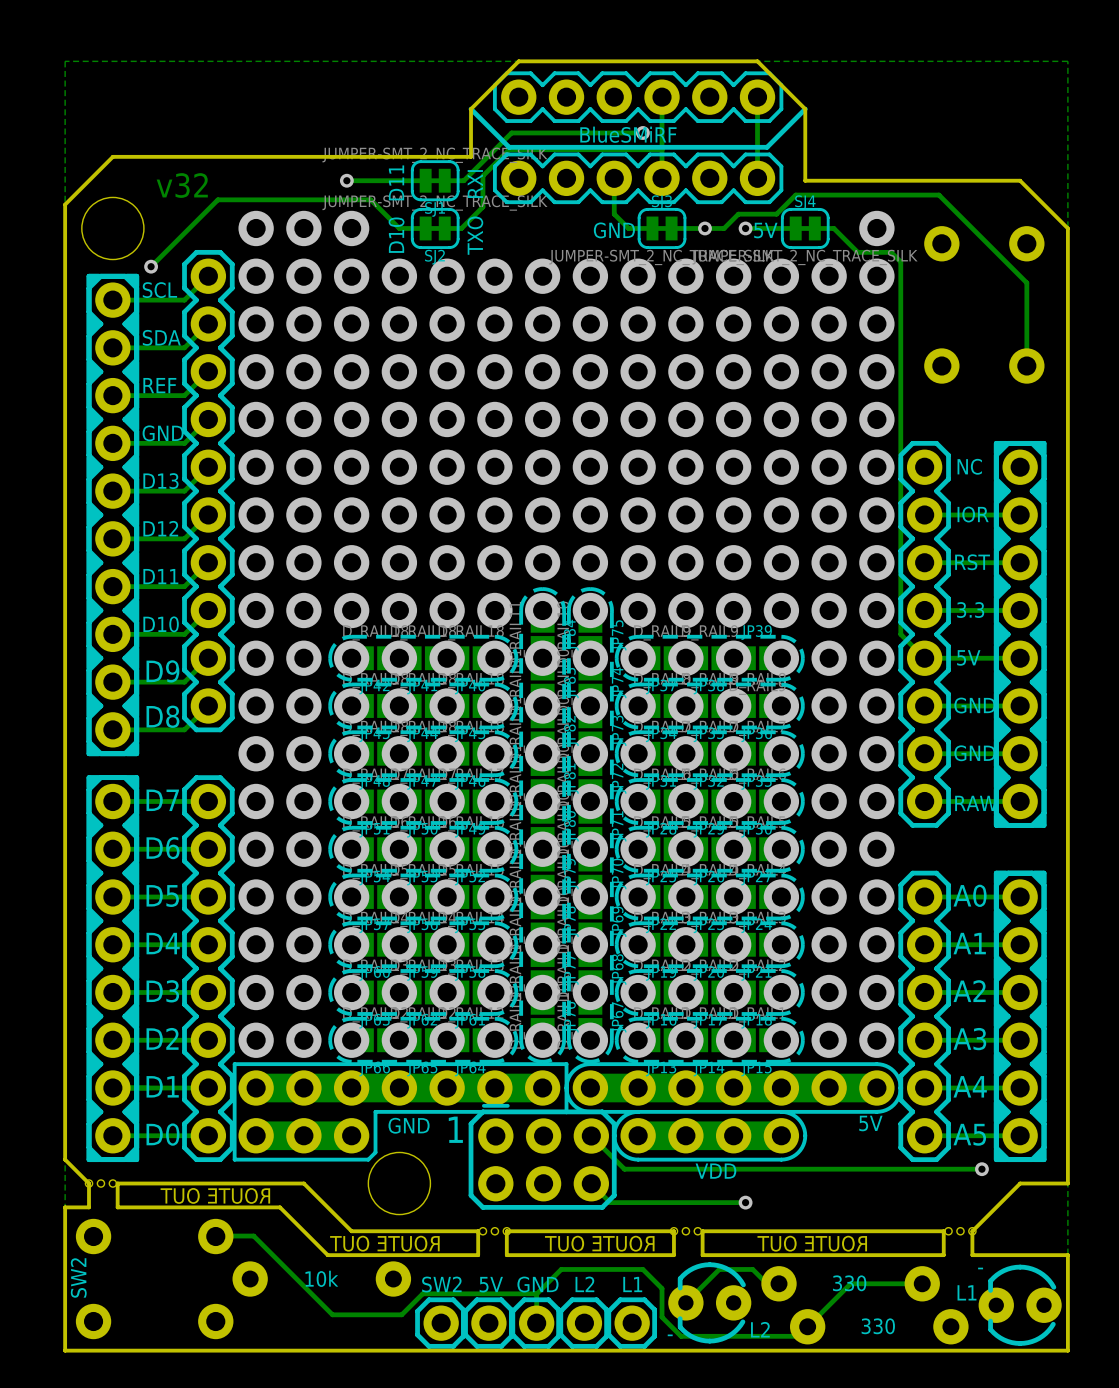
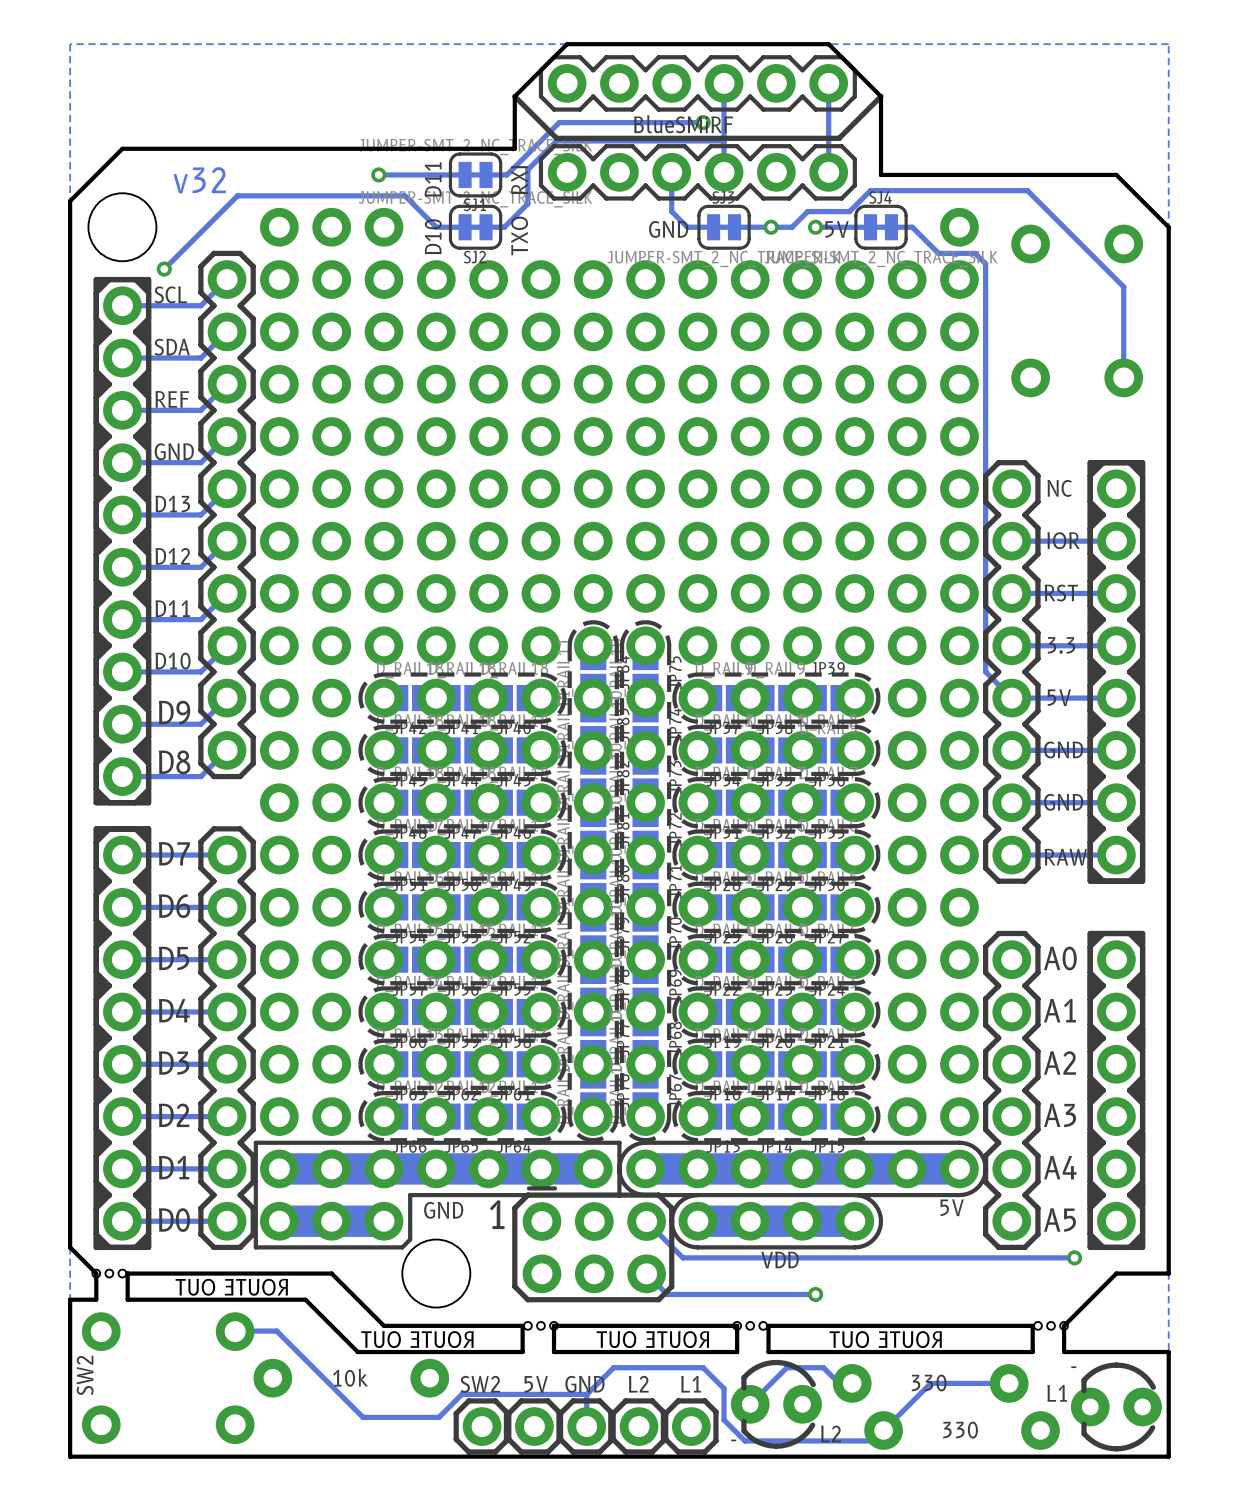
track: (1020, 897) (924, 897) -> none
track: (1020, 944) (924, 944) -> none
track: (1020, 992) (924, 992) -> none
track: (1020, 1040) (924, 1040) -> none
track: (1020, 1088) (924, 1088) -> none
track: (1020, 1135) (924, 1135) -> none

